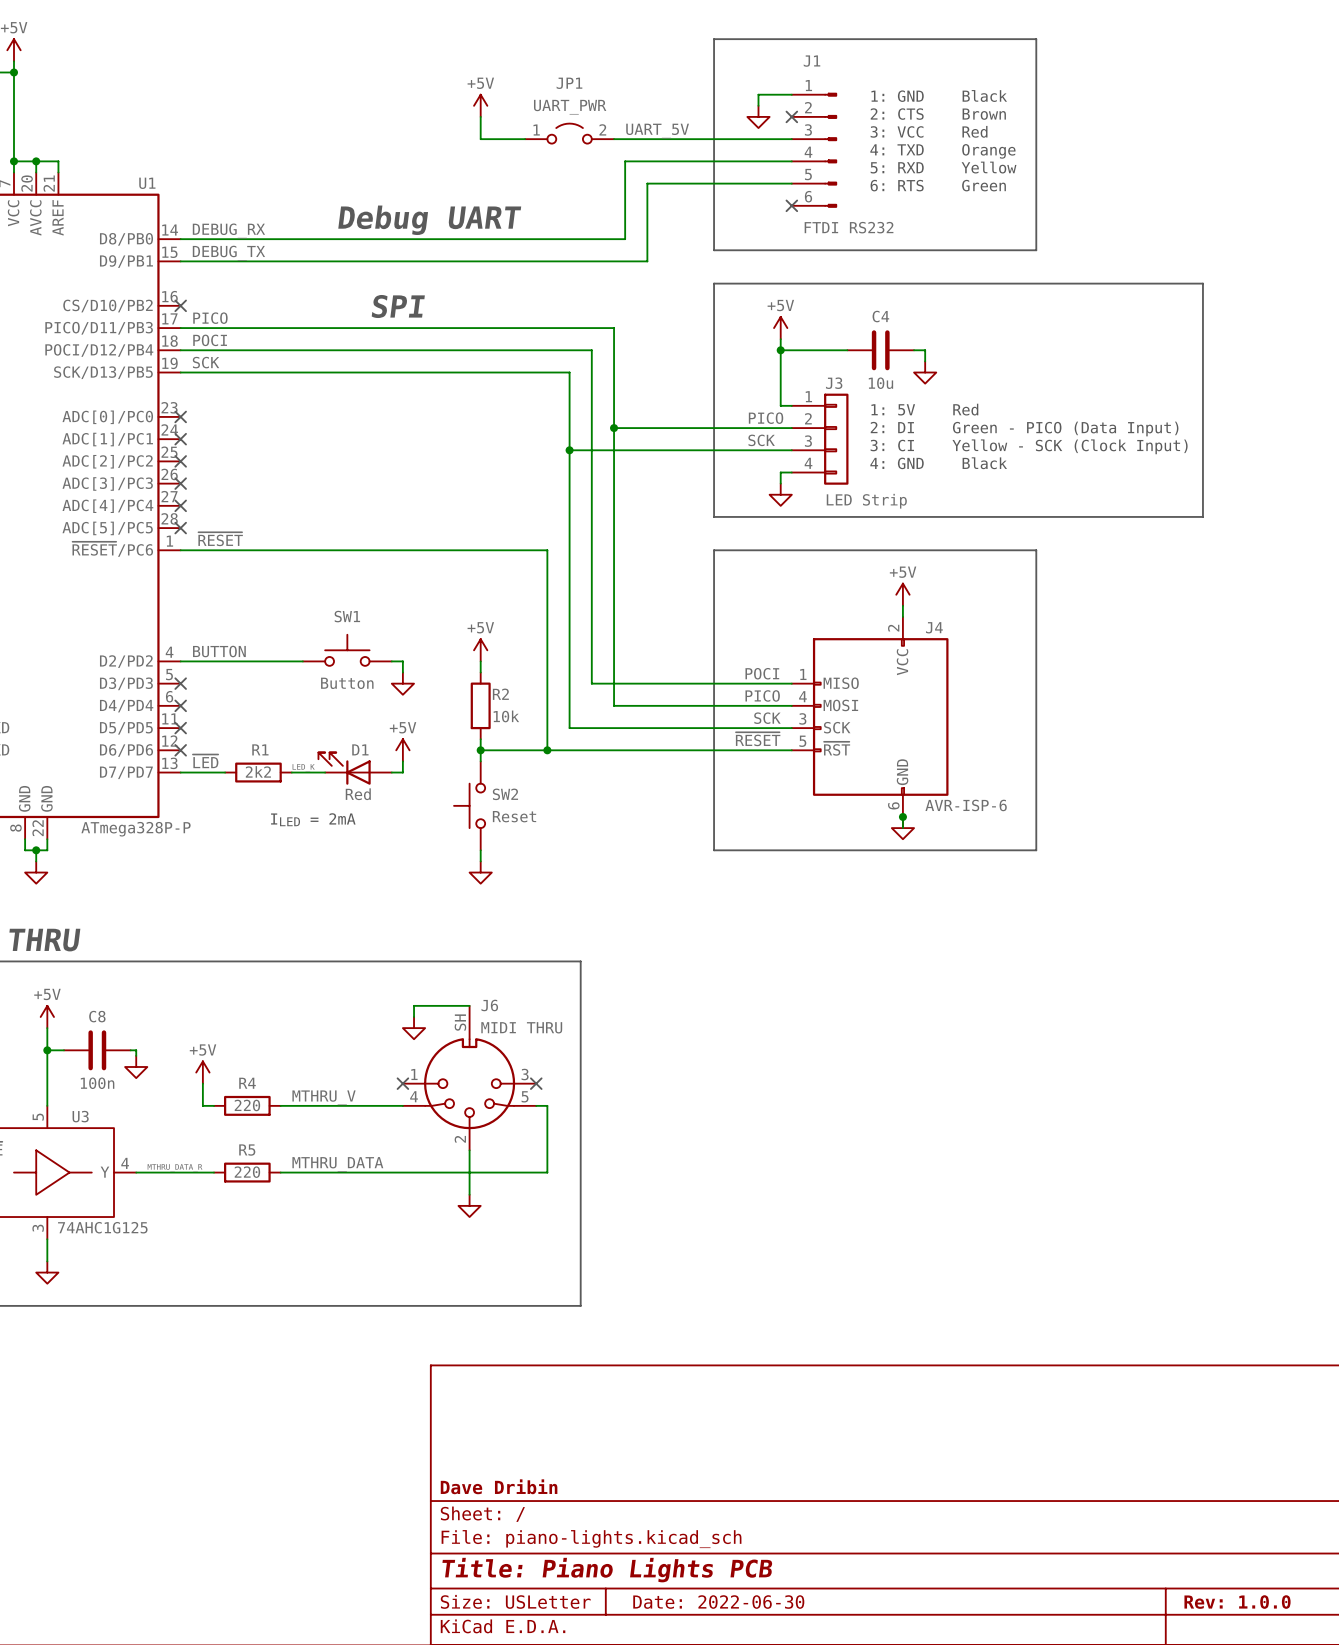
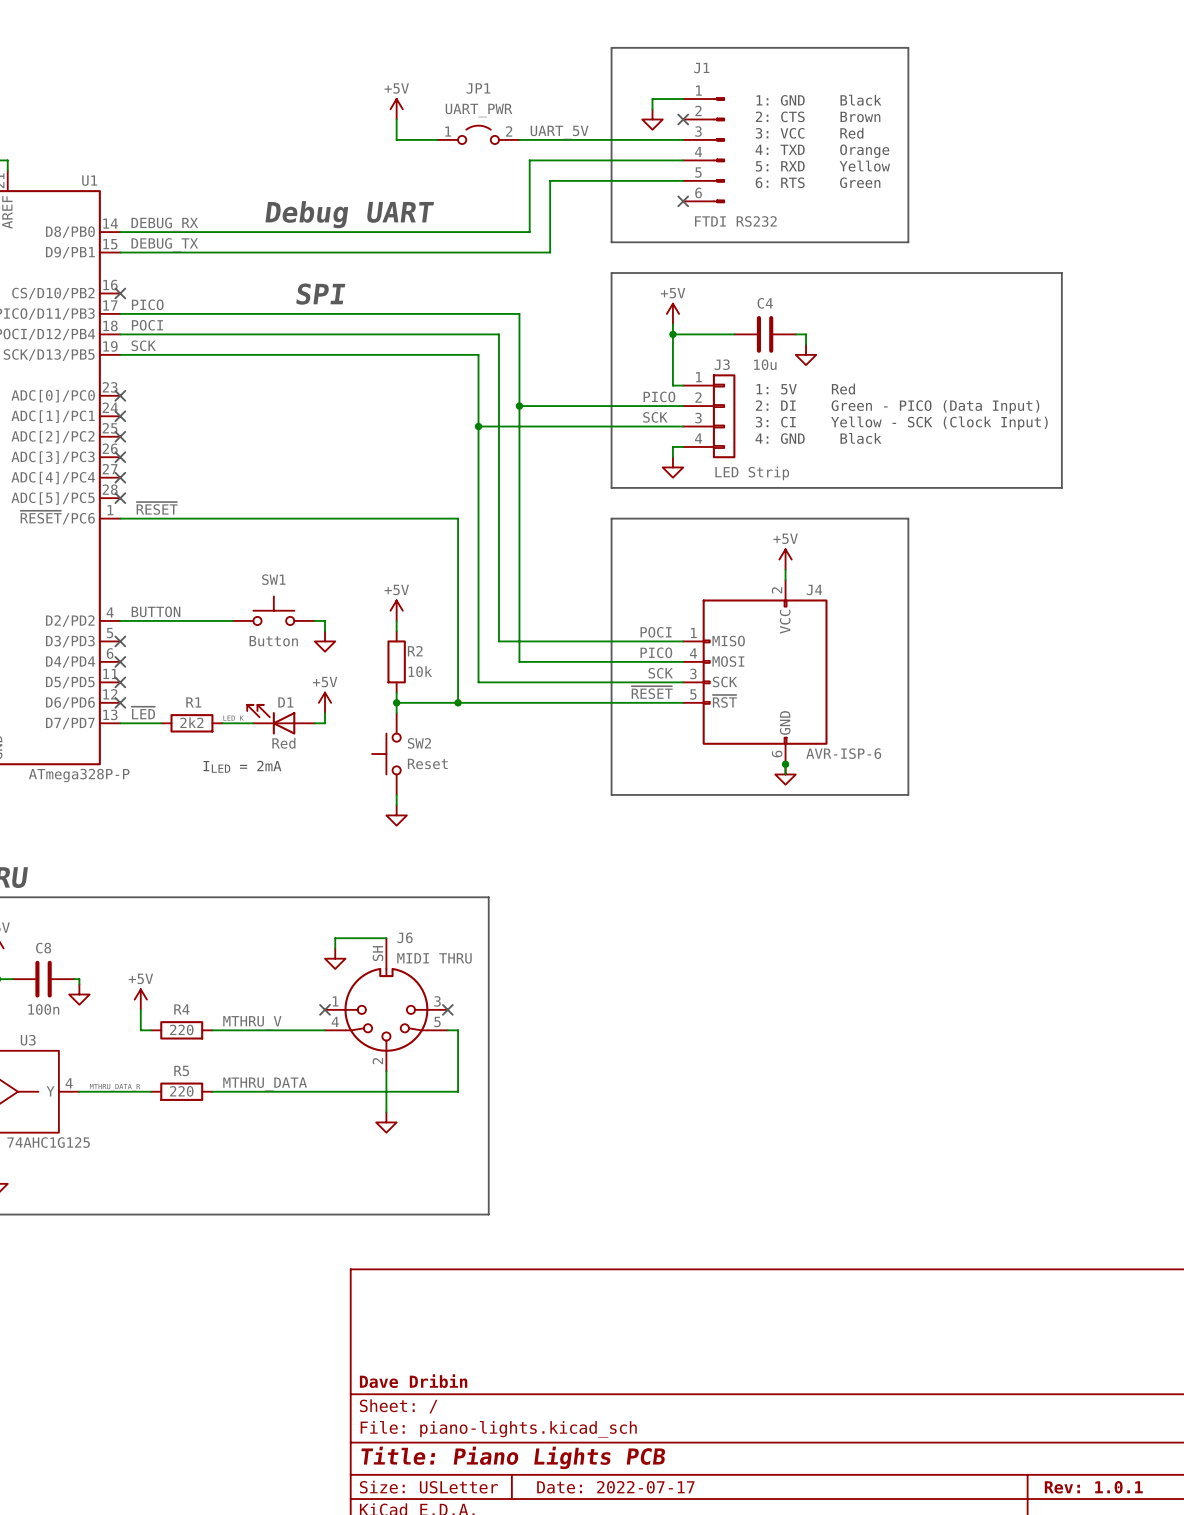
title block: Date: 2022-06-30 (718, 1602) -> Date: 2022-07-17 (615, 1487)
title block: Rev: 1.0.0 (1237, 1602) -> Rev: 1.0.1 (1093, 1487)

